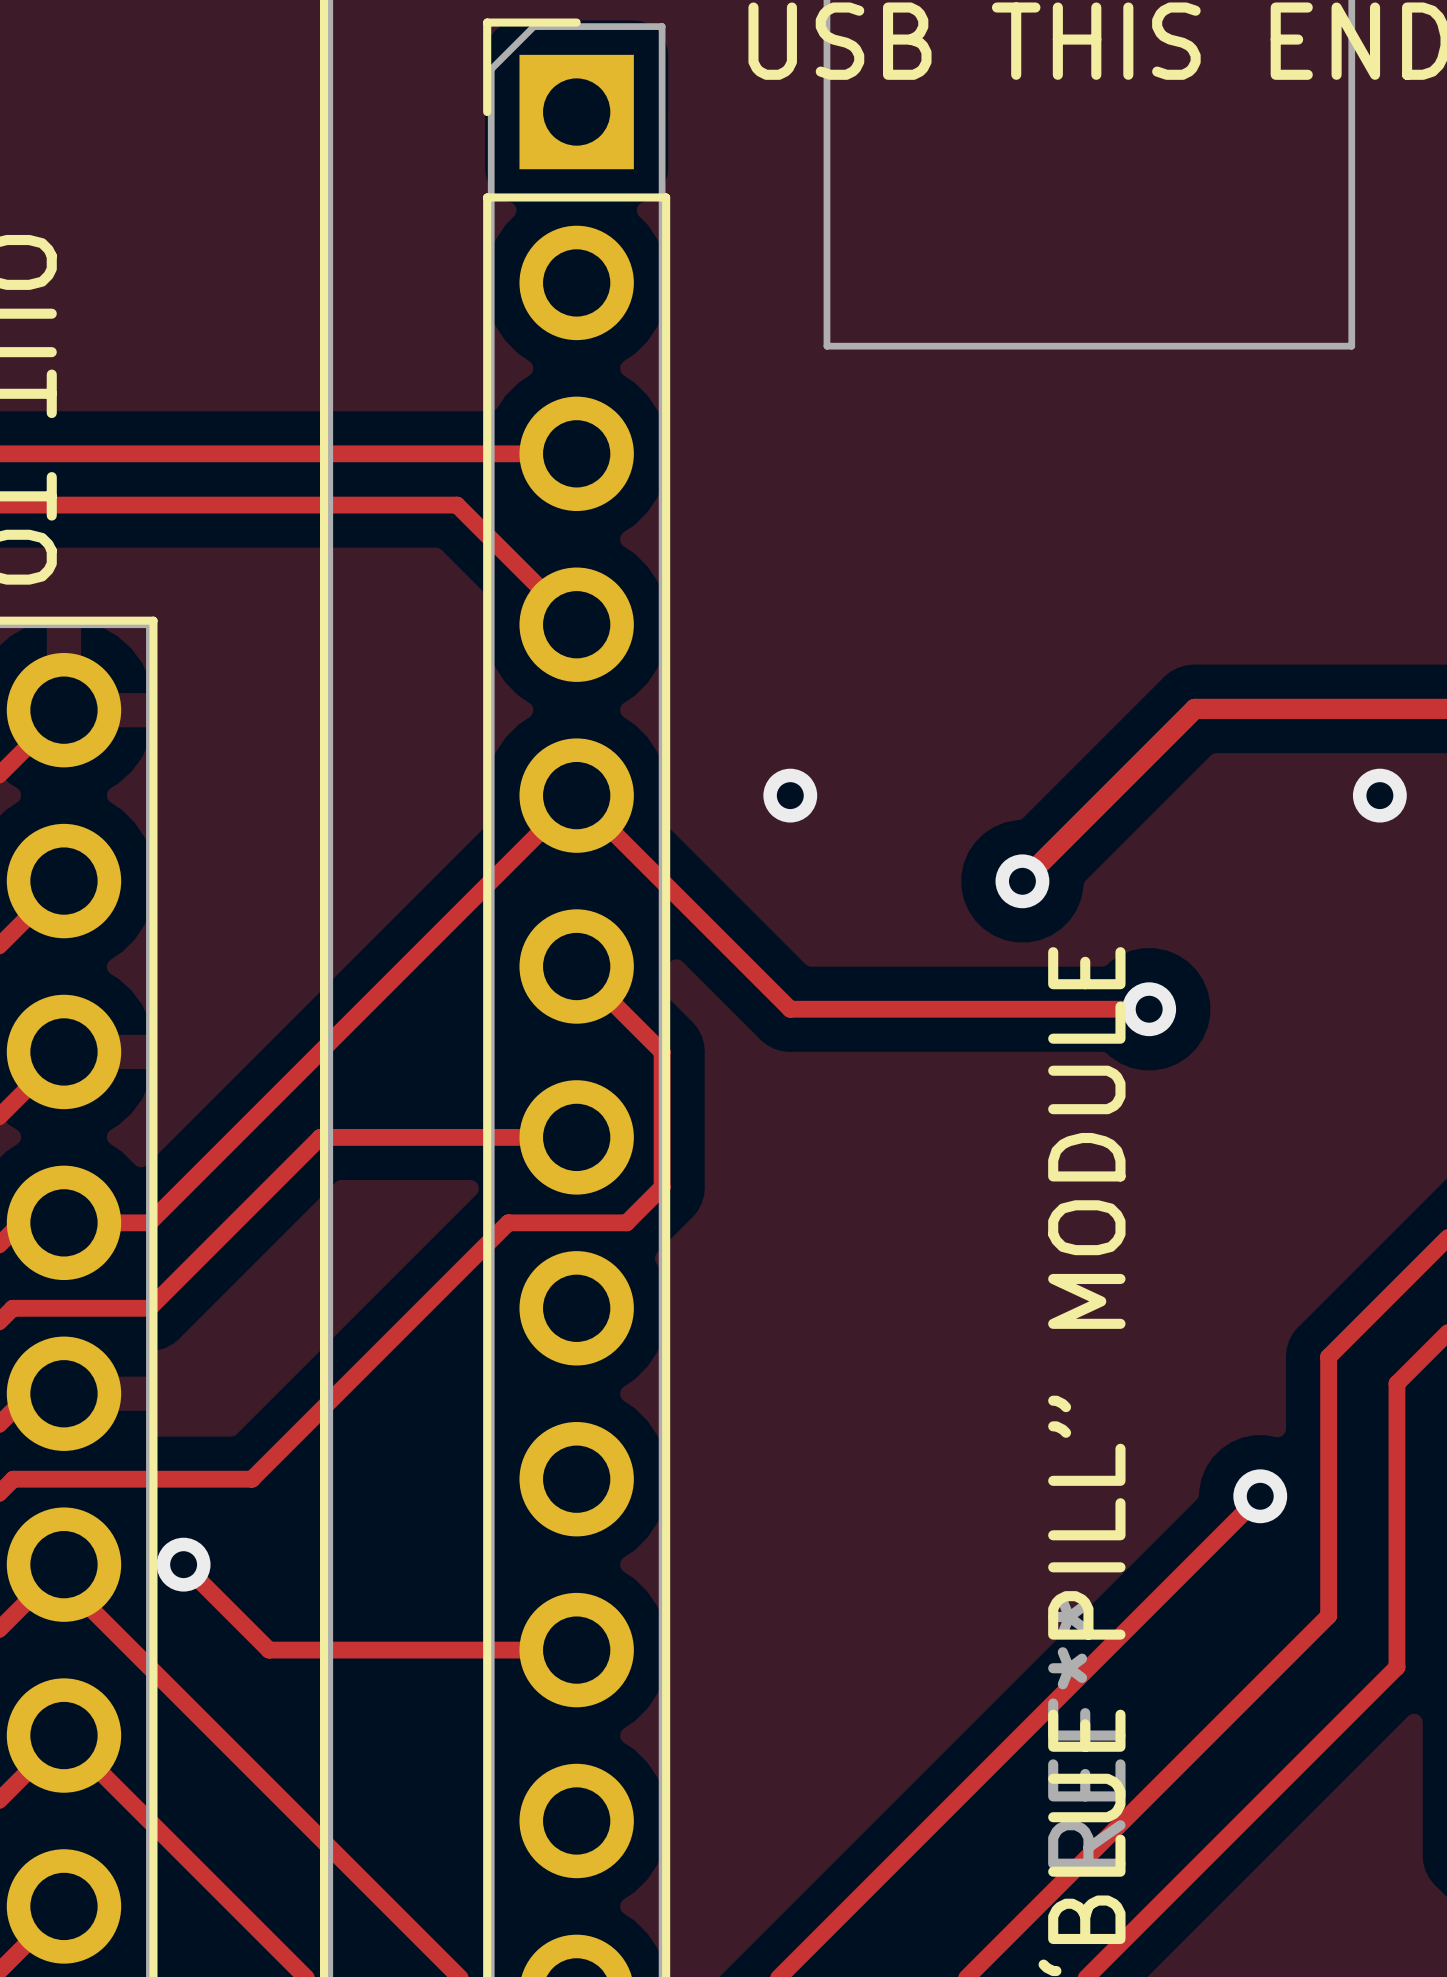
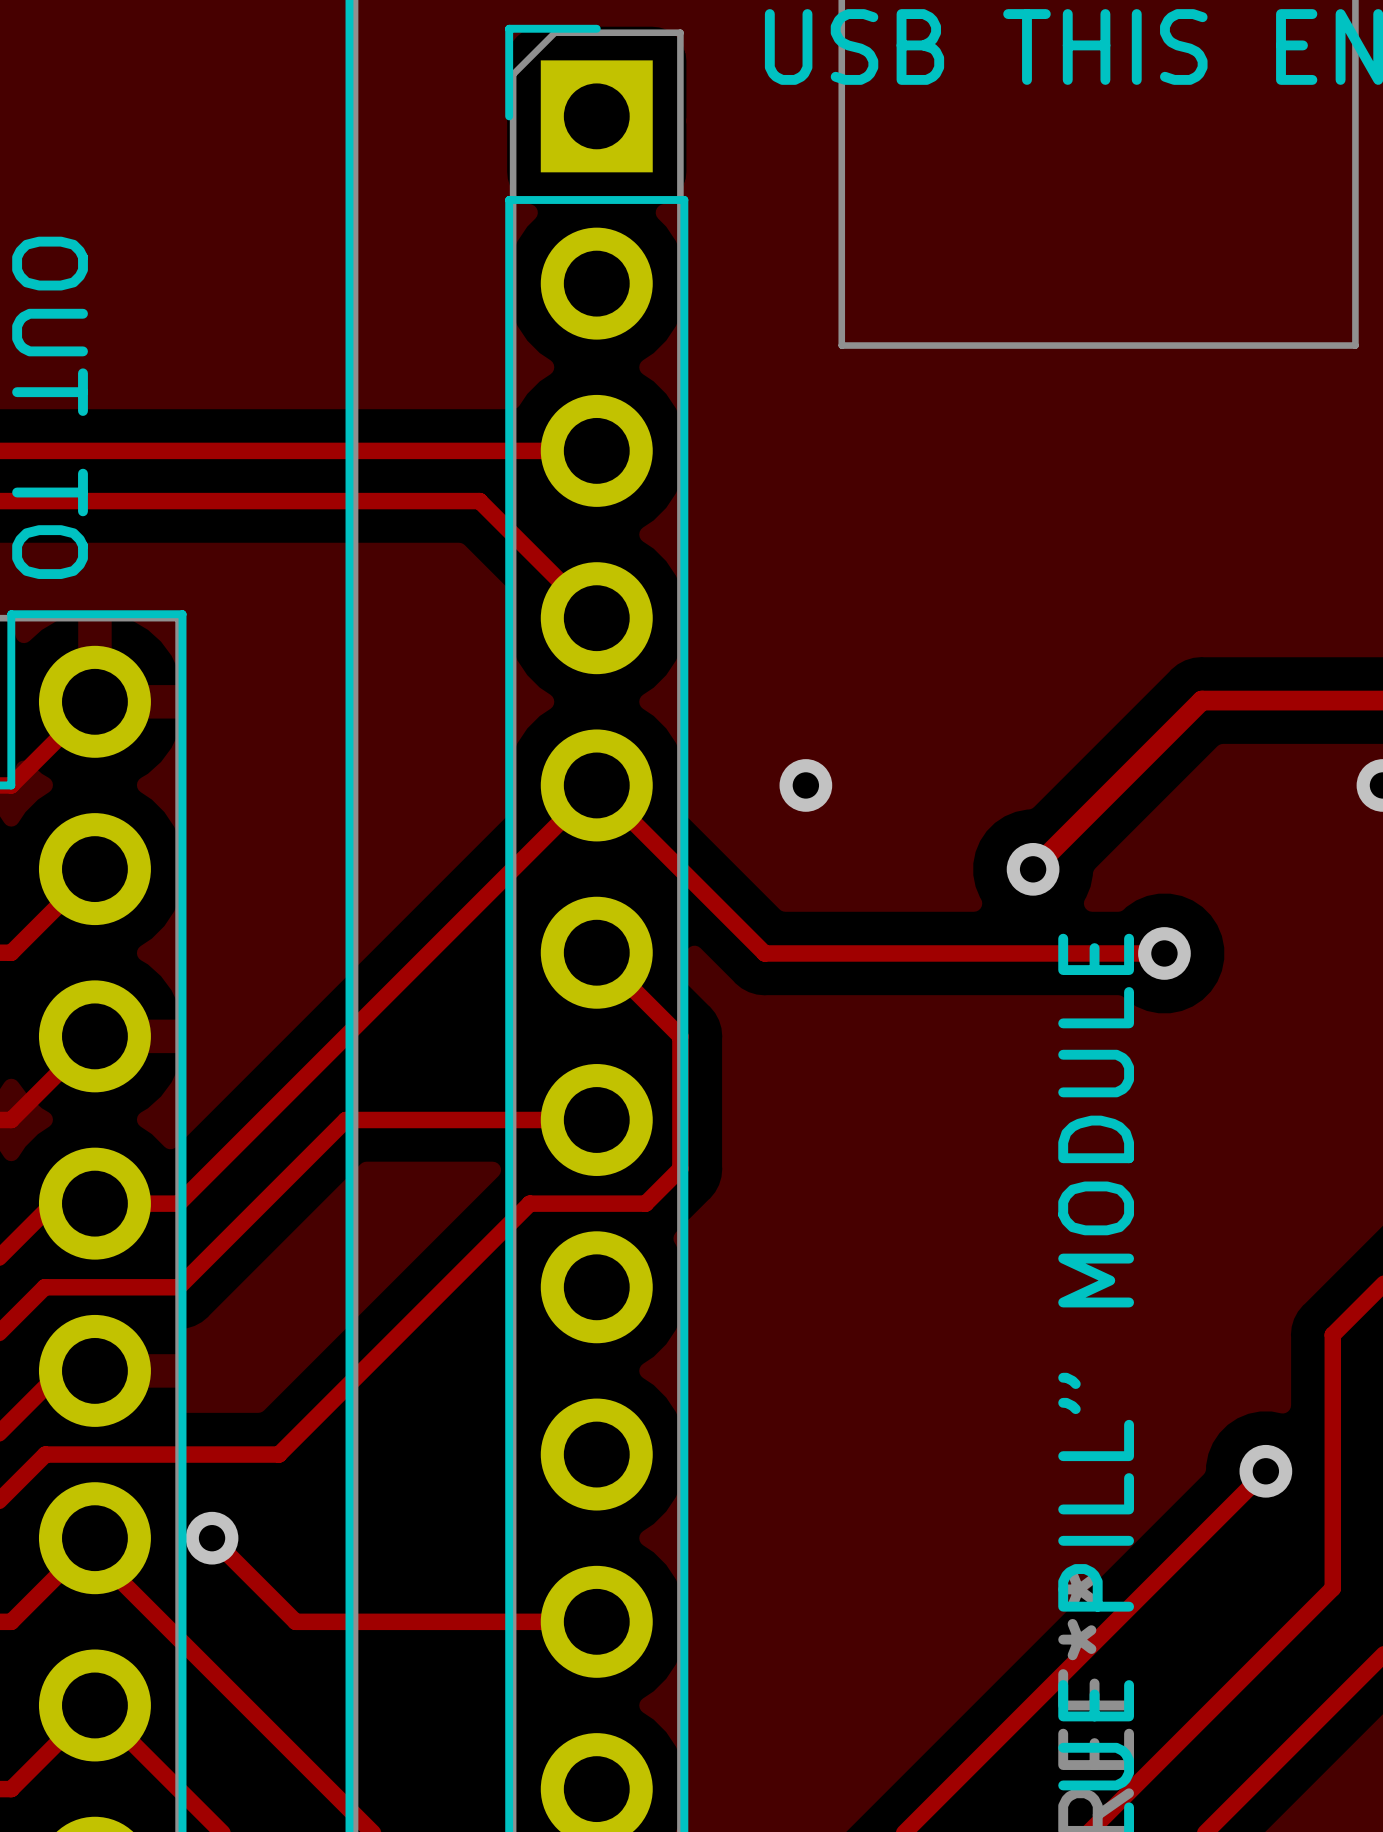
track: (748, 967) (790, 1009) (1149, 1009) -> (764, 953) (1164, 953)
via position: (1149, 1009) -> (1164, 953)

